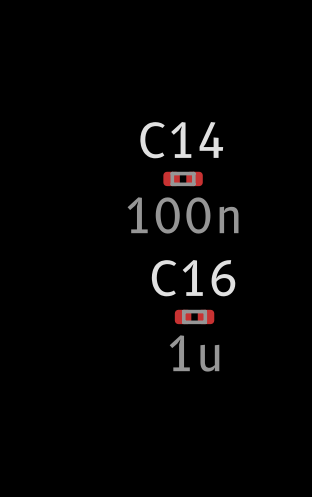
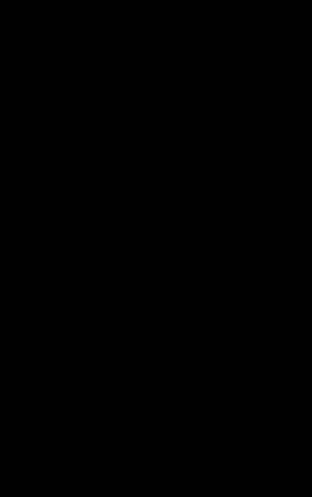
C14: 100n (183, 178) -> none
C16: 1u (194, 316) -> none

